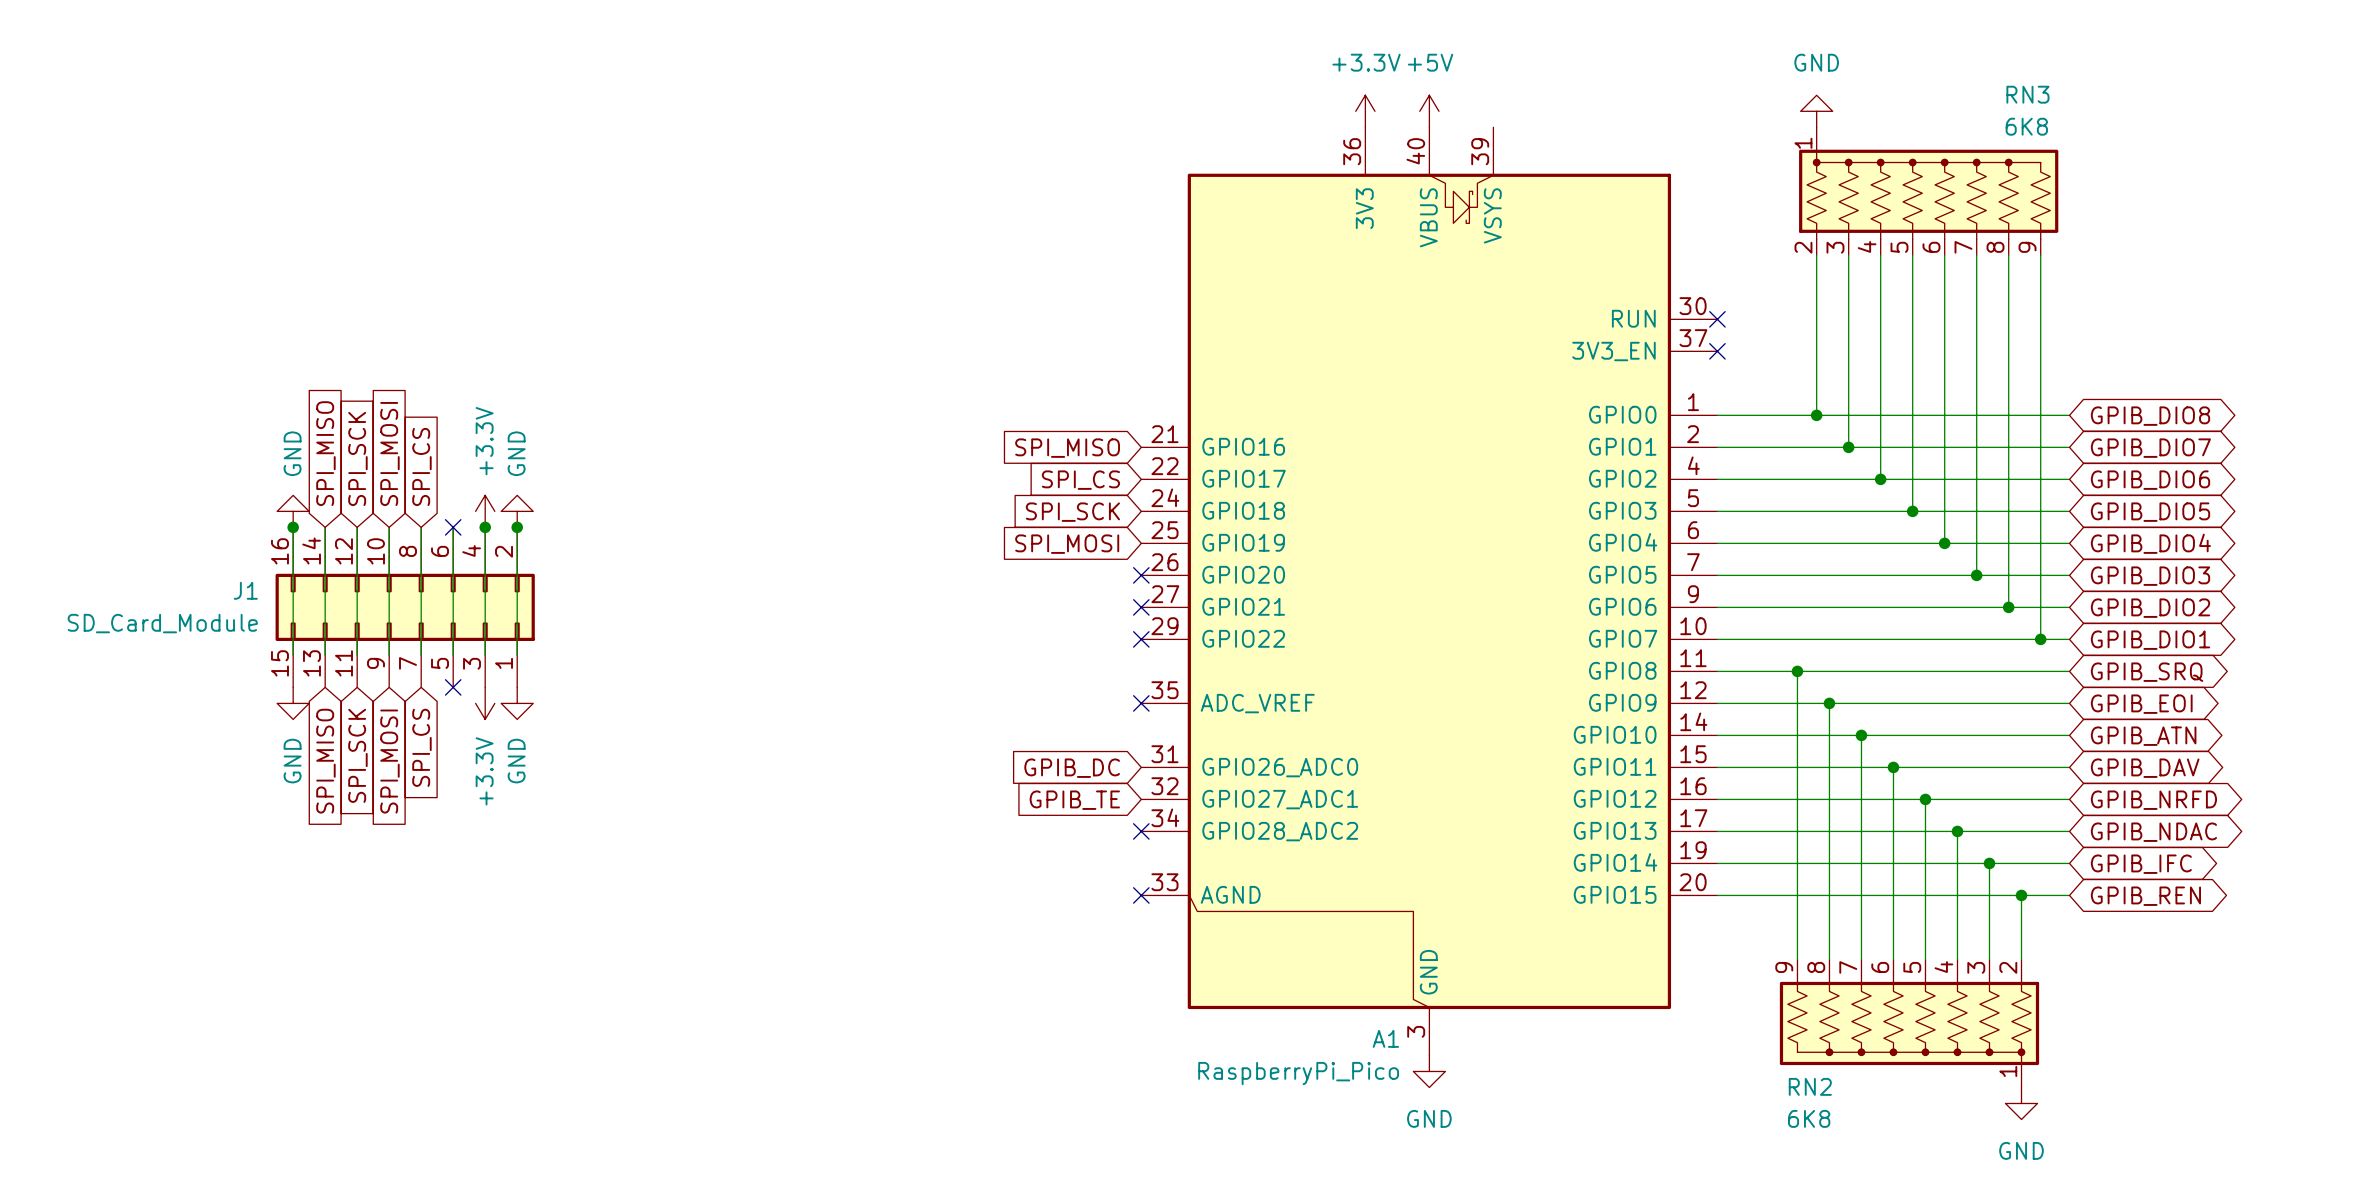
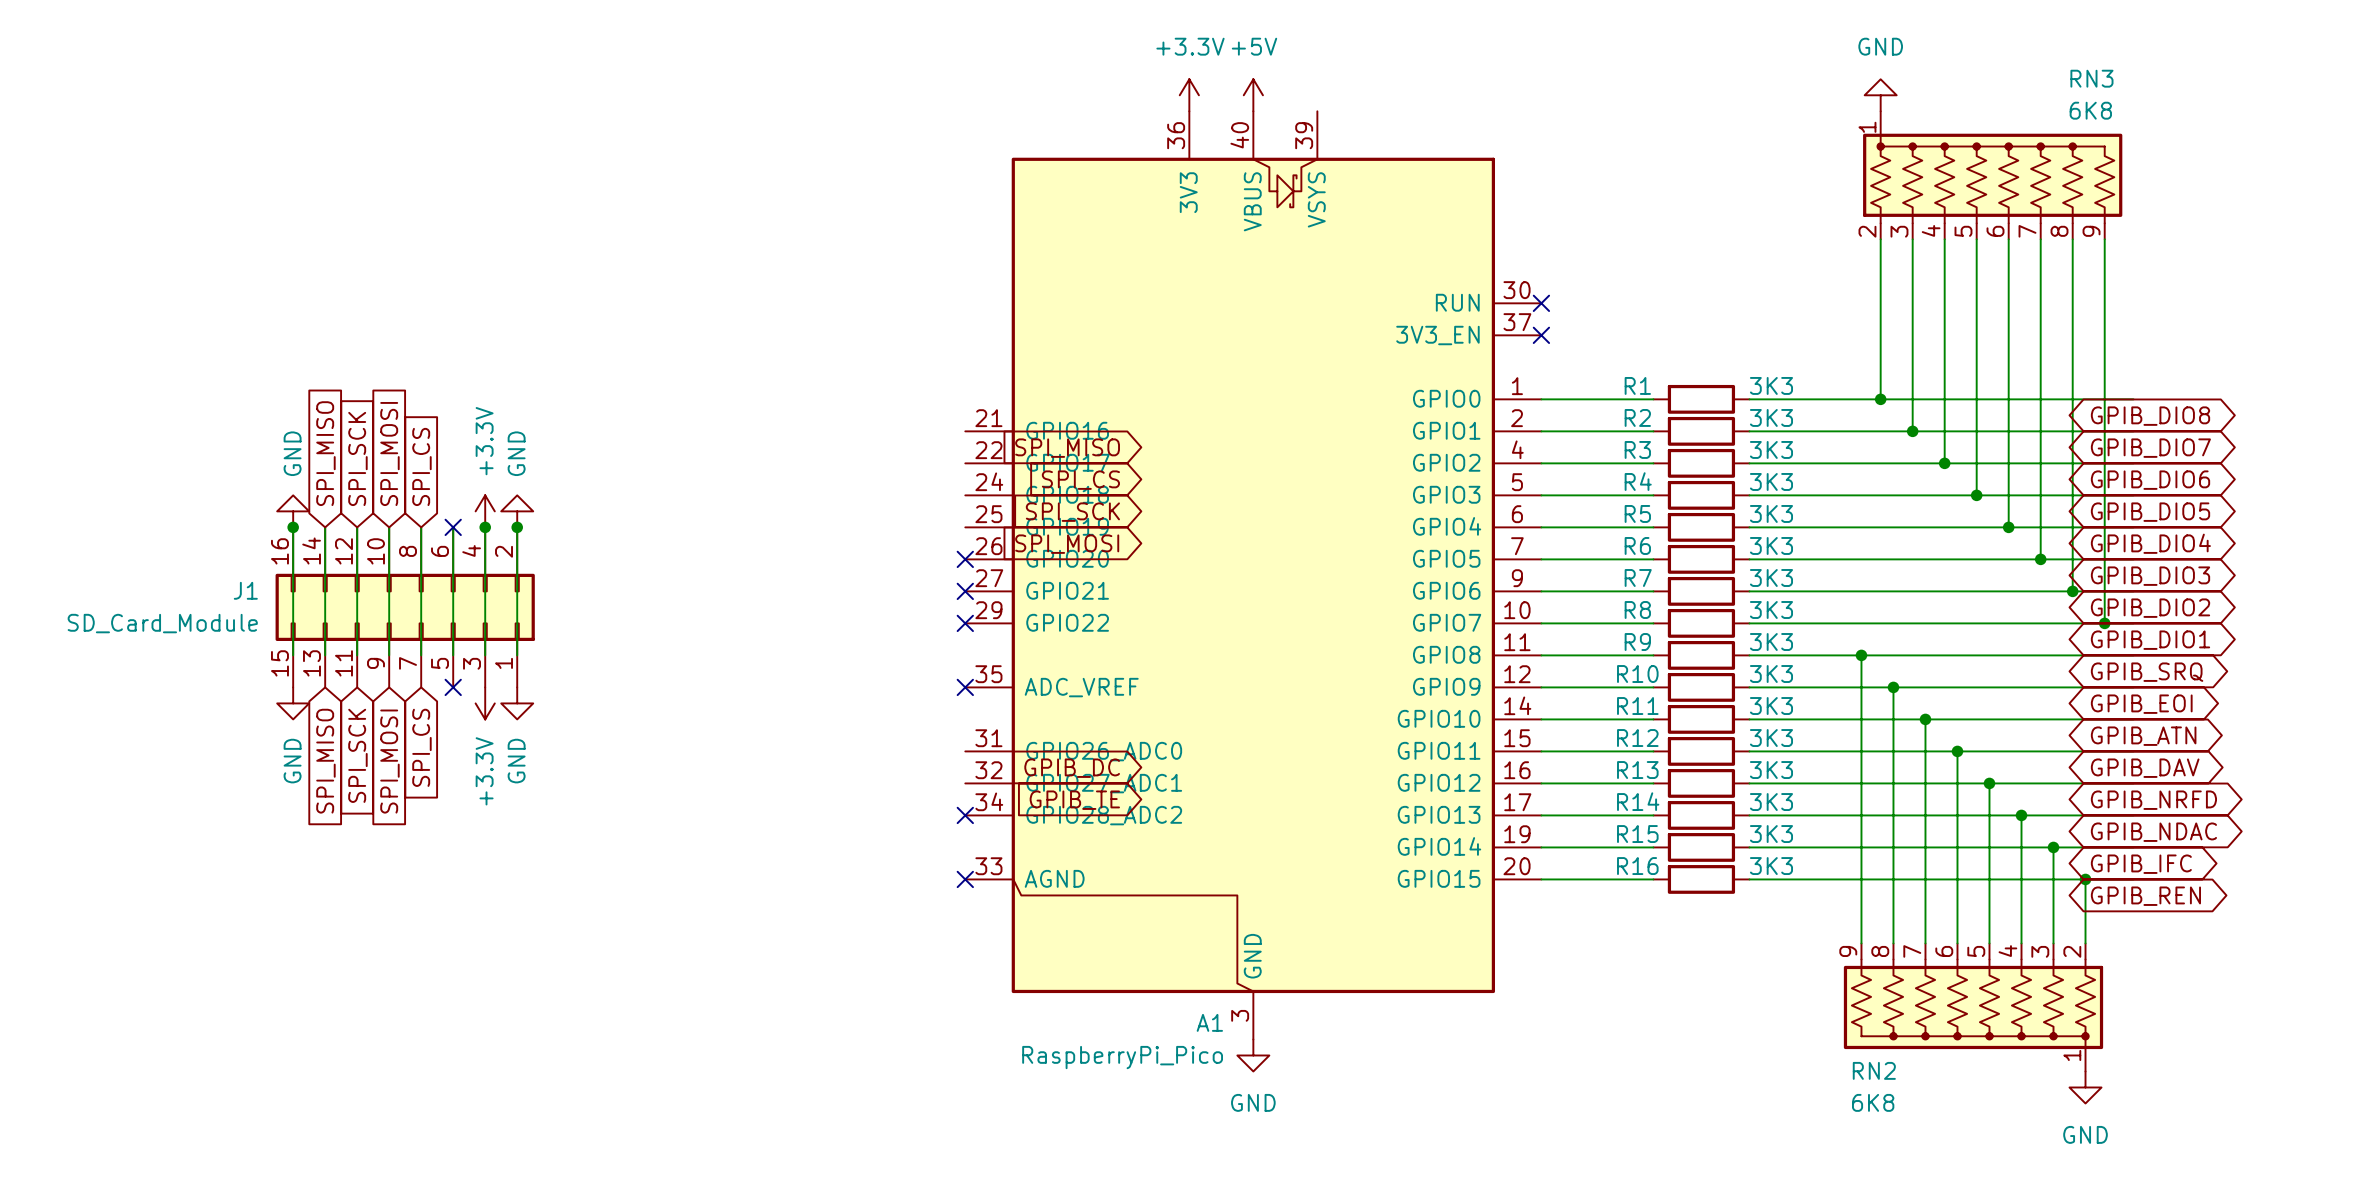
power symbol position: +3.3V (1365, 111) -> +3.3V (1189, 95)
power symbol position: +5V (1429, 111) -> +5V (1253, 95)
power symbol position: GND (1816, 111) -> GND (1880, 95)
RN3 position: (1928, 191) -> (1992, 175)
wire: none -> (2072, 239) (2072, 591)
wire: none -> (2104, 239) (2104, 623)
wire: (1816, 255) (1816, 415) -> none
wire: (1848, 255) (1848, 447) -> none
no-connect mark: none -> (1541, 303)
no-connect mark: (1717, 319) -> none
no-connect mark: none -> (1541, 335)
no-connect mark: (1717, 351) -> none
R1: none -> 3K3 (1701, 399)
wire: none -> (1749, 399) (2133, 399)
wire: (1880, 399) (1880, 479) -> (1861, 655) (1861, 735)
junction: none -> (1880, 399)
wire: (1717, 415) (2069, 415) -> none
junction: (1816, 415) -> none
R2: none -> 3K3 (1701, 431)
wire: none -> (1749, 431) (2133, 431)
wire: (1912, 431) (1912, 511) -> (1893, 687) (1893, 767)
junction: none -> (1912, 431)
wire: (1717, 447) (2069, 447) -> none
junction: (1848, 447) -> none
R3: none -> 3K3 (1701, 463)
wire: none -> (1749, 463) (2133, 463)
wire: (1944, 463) (1944, 543) -> (1925, 719) (1925, 799)
junction: none -> (1944, 463)
wire: (1717, 479) (2069, 479) -> none
junction: (1880, 479) -> none
R4: none -> 3K3 (1701, 495)
wire: none -> (1749, 495) (2133, 495)
wire: (1976, 495) (1976, 575) -> (1957, 751) (1957, 831)
junction: none -> (1976, 495)
wire: (1717, 511) (2069, 511) -> none
junction: (1912, 511) -> none
R5: none -> 3K3 (1701, 527)
wire: none -> (1749, 527) (2133, 527)
wire: (2008, 527) (2008, 607) -> (1989, 783) (1989, 863)
junction: none -> (2008, 527)
wire: (1717, 543) (2069, 543) -> none
junction: (1944, 543) -> none
no-connect mark: none -> (965, 559)
R6: none -> 3K3 (1701, 559)
wire: none -> (1749, 559) (2133, 559)
wire: (2040, 559) (2040, 639) -> (2021, 815) (2021, 895)
junction: none -> (2040, 559)
no-connect mark: (1141, 575) -> none
wire: (1717, 575) (2069, 575) -> none
junction: (1976, 575) -> none
no-connect mark: none -> (965, 591)
A1 position: (1429, 591) -> (1253, 575)
R7: none -> 3K3 (1701, 591)
wire: none -> (1749, 591) (2133, 591)
junction: none -> (2072, 591)
no-connect mark: (1141, 607) -> none
wire: (1717, 607) (2069, 607) -> none
junction: (2008, 607) -> none
no-connect mark: none -> (965, 623)
R8: none -> 3K3 (1701, 623)
wire: none -> (1749, 623) (2133, 623)
junction: none -> (2104, 623)
no-connect mark: (1141, 639) -> none
wire: (1717, 639) (2069, 639) -> none
junction: (2040, 639) -> none
R9: none -> 3K3 (1701, 655)
wire: none -> (1749, 655) (2133, 655)
junction: none -> (1861, 655)
wire: (1717, 671) (2069, 671) -> none
wire: (1797, 671) (1797, 959) -> none
junction: (1797, 671) -> none
no-connect mark: none -> (965, 687)
R10: none -> 3K3 (1701, 687)
wire: none -> (1749, 687) (2133, 687)
junction: none -> (1893, 687)
no-connect mark: (1141, 703) -> none
wire: (1717, 703) (2069, 703) -> none
wire: (1829, 703) (1829, 959) -> none
junction: (1829, 703) -> none
R11: none -> 3K3 (1701, 719)
wire: none -> (1749, 719) (2133, 719)
junction: none -> (1925, 719)
wire: (1717, 735) (2069, 735) -> none
junction: (1861, 735) -> none
R12: none -> 3K3 (1701, 751)
wire: none -> (1749, 751) (2133, 751)
junction: none -> (1957, 751)
wire: (1717, 767) (2069, 767) -> none
junction: (1893, 767) -> none
R13: none -> 3K3 (1701, 783)
wire: none -> (1749, 783) (2133, 783)
junction: none -> (1989, 783)
wire: (1717, 799) (2069, 799) -> none
junction: (1925, 799) -> none
no-connect mark: none -> (965, 815)
R14: none -> 3K3 (1701, 815)
wire: none -> (1749, 815) (2133, 815)
junction: none -> (2021, 815)
no-connect mark: (1141, 831) -> none
wire: (1717, 831) (2069, 831) -> none
junction: (1957, 831) -> none
R15: none -> 3K3 (1701, 847)
wire: none -> (1749, 847) (2133, 847)
wire: none -> (2053, 847) (2053, 943)
junction: none -> (2053, 847)
wire: (1717, 863) (2069, 863) -> none
junction: (1989, 863) -> none
no-connect mark: none -> (965, 879)
R16: none -> 3K3 (1701, 879)
wire: none -> (1749, 879) (2133, 879)
wire: none -> (2085, 879) (2085, 943)
junction: none -> (2085, 879)
no-connect mark: (1141, 895) -> none
wire: (1717, 895) (2069, 895) -> none
junction: (2021, 895) -> none
RN2 position: (1909, 1023) -> (1973, 1007)
power symbol position: GND (1429, 1071) -> GND (1253, 1055)
power symbol position: GND (2021, 1103) -> GND (2085, 1087)

